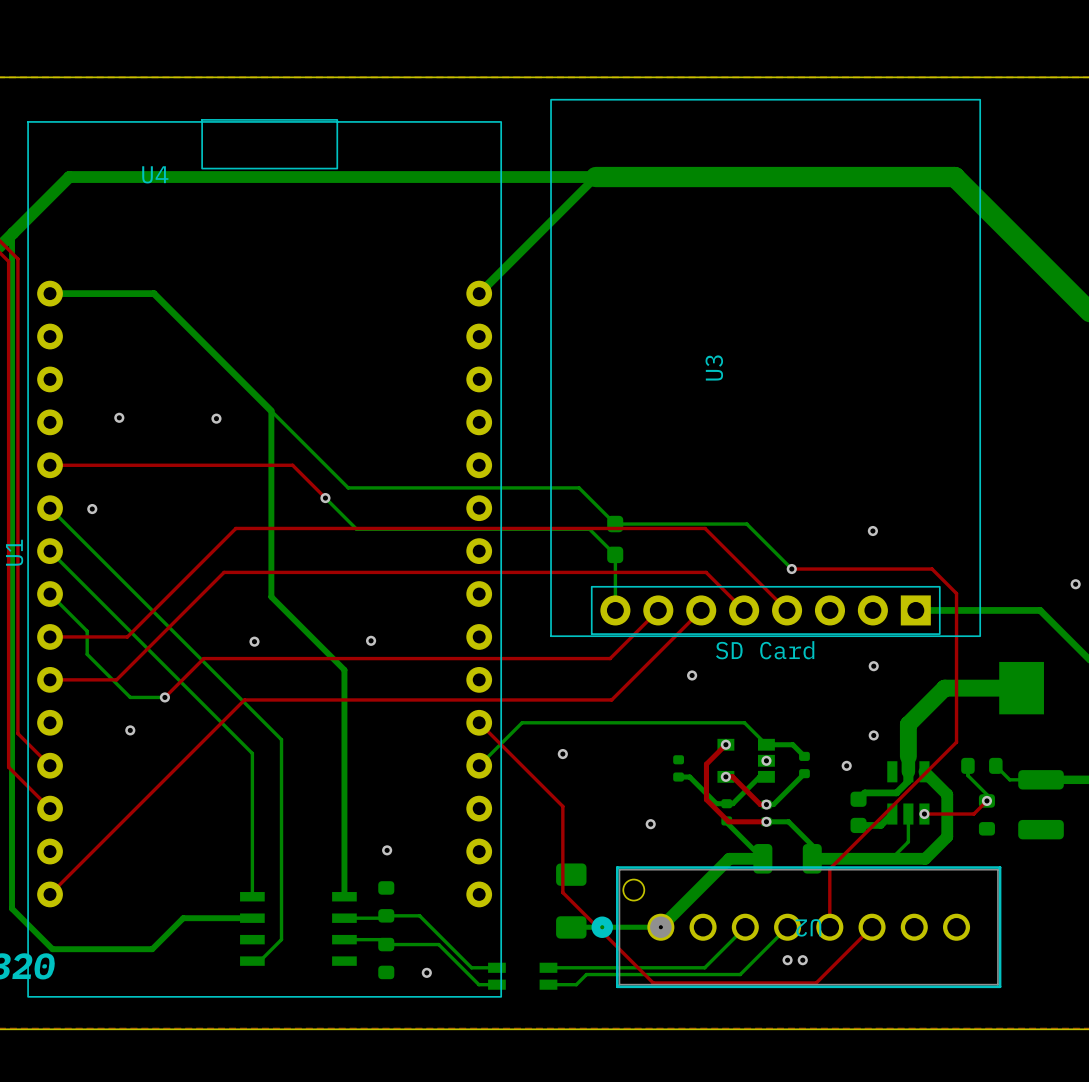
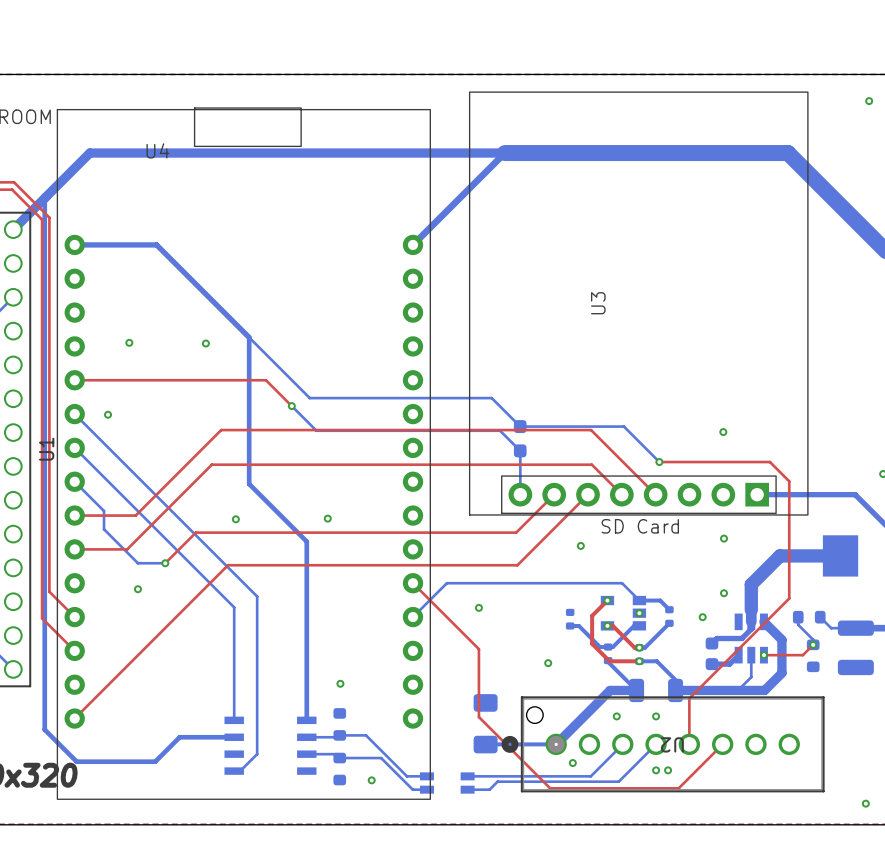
via: none -> (869, 101)
via: none -> (616, 716)
via: none -> (656, 716)
via: none -> (572, 763)
via: none -> (865, 803)

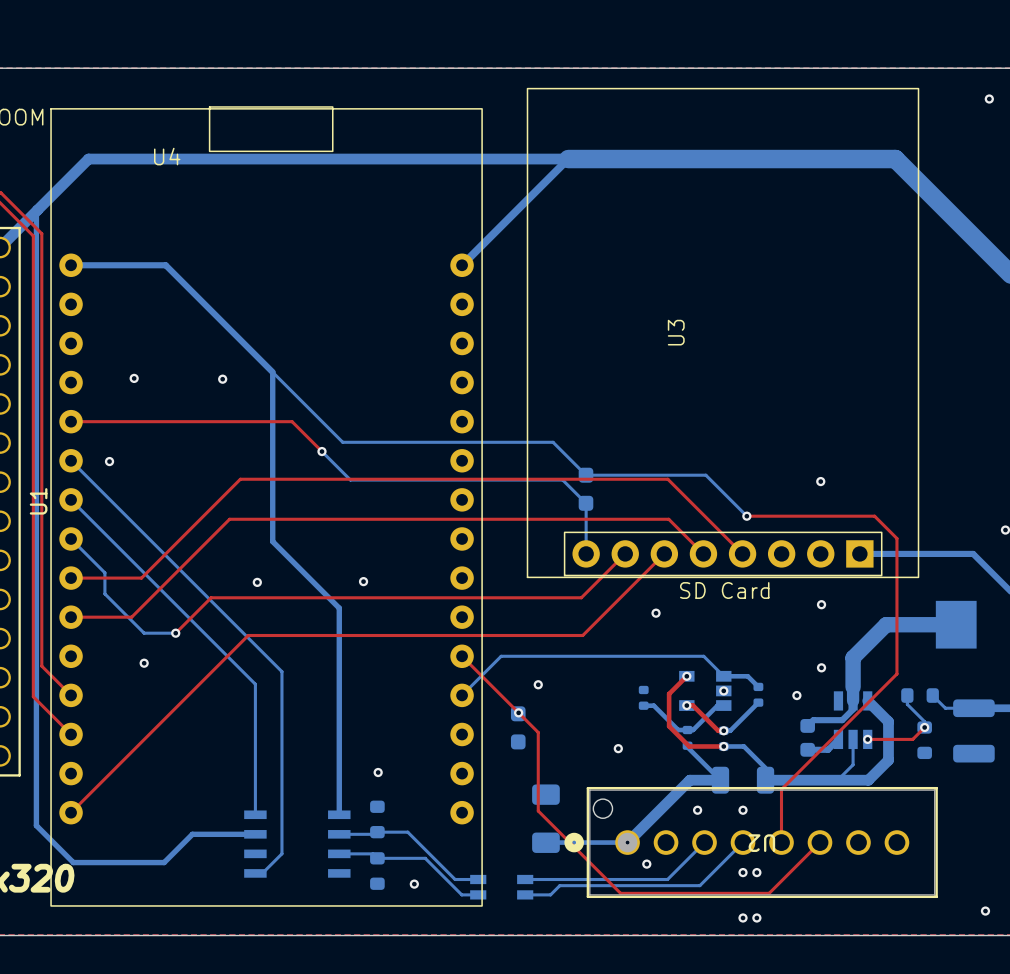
via: none -> (518, 712)
part: none -> (518, 727)
via: none -> (743, 917)
via: none -> (756, 917)

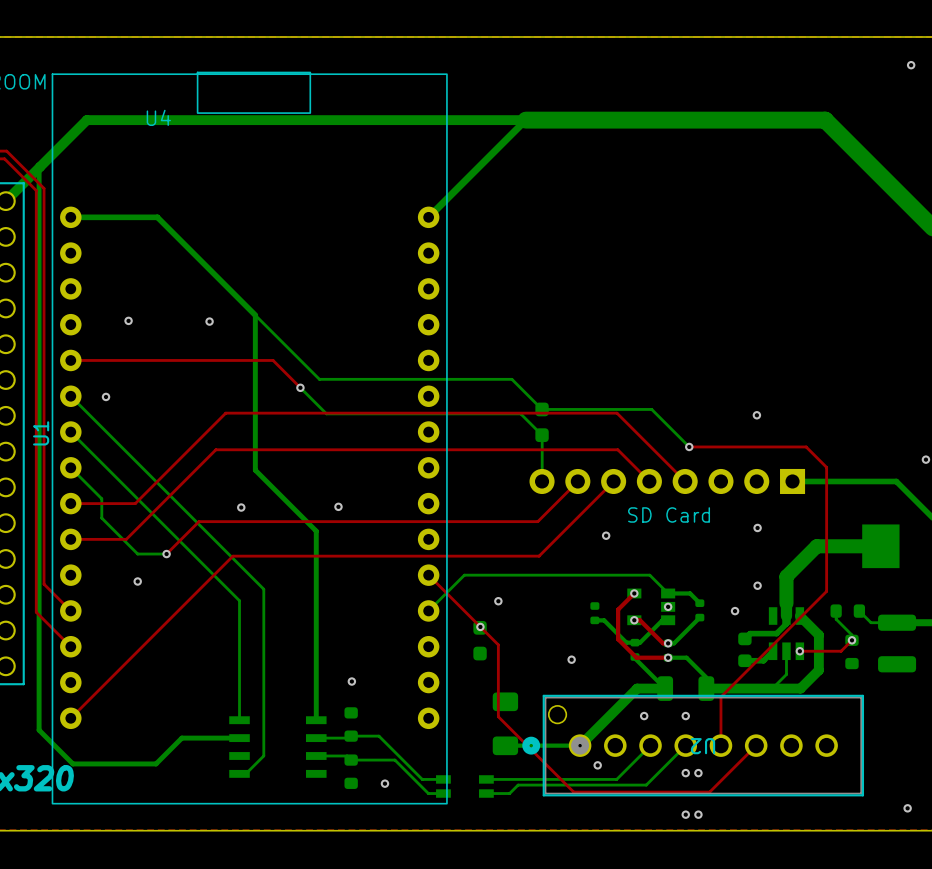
U3 side: top (723, 333) -> bottom (667, 481)

